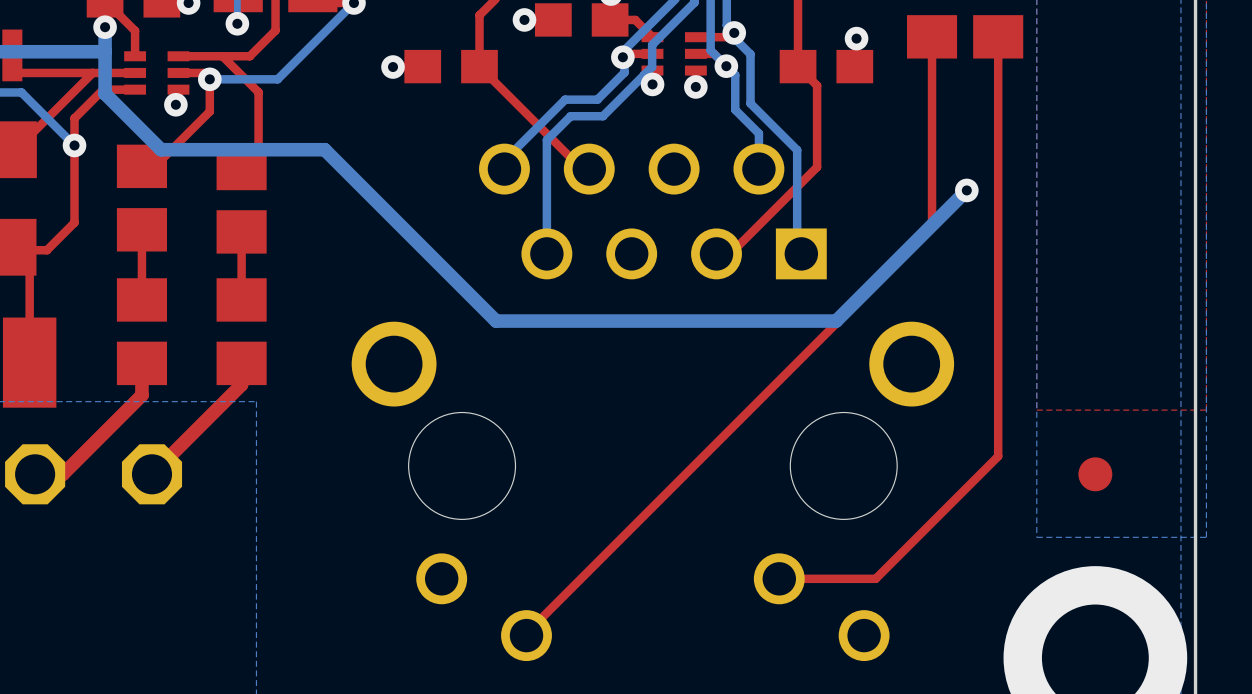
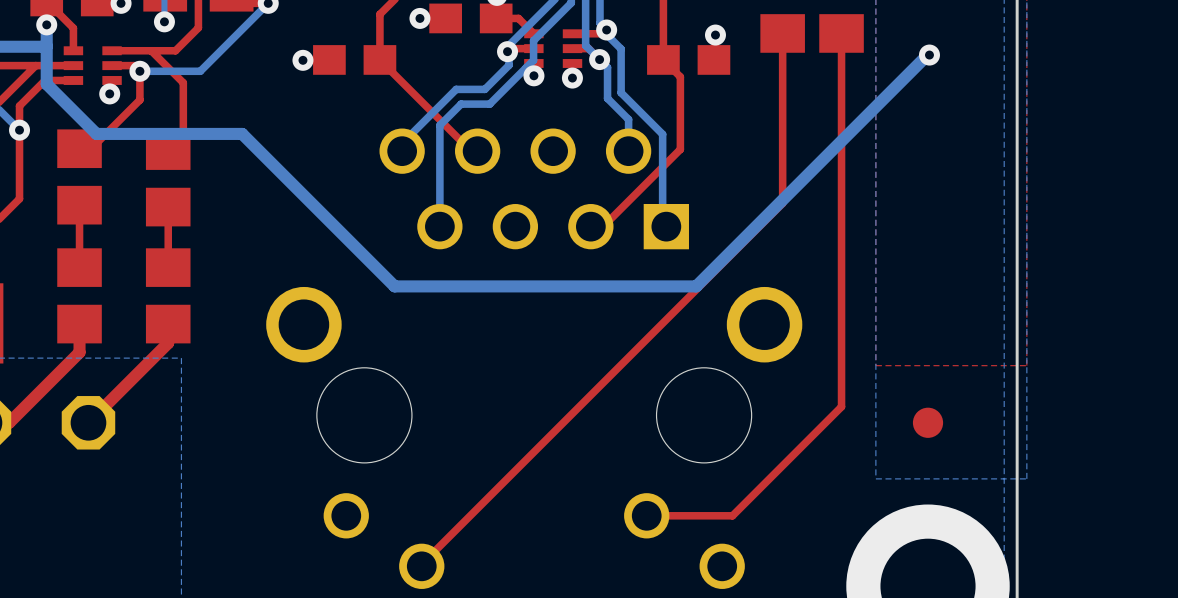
bottom track: (966, 190) (834, 321) -> (929, 55) (696, 286)
via position: (966, 190) -> (929, 55)

